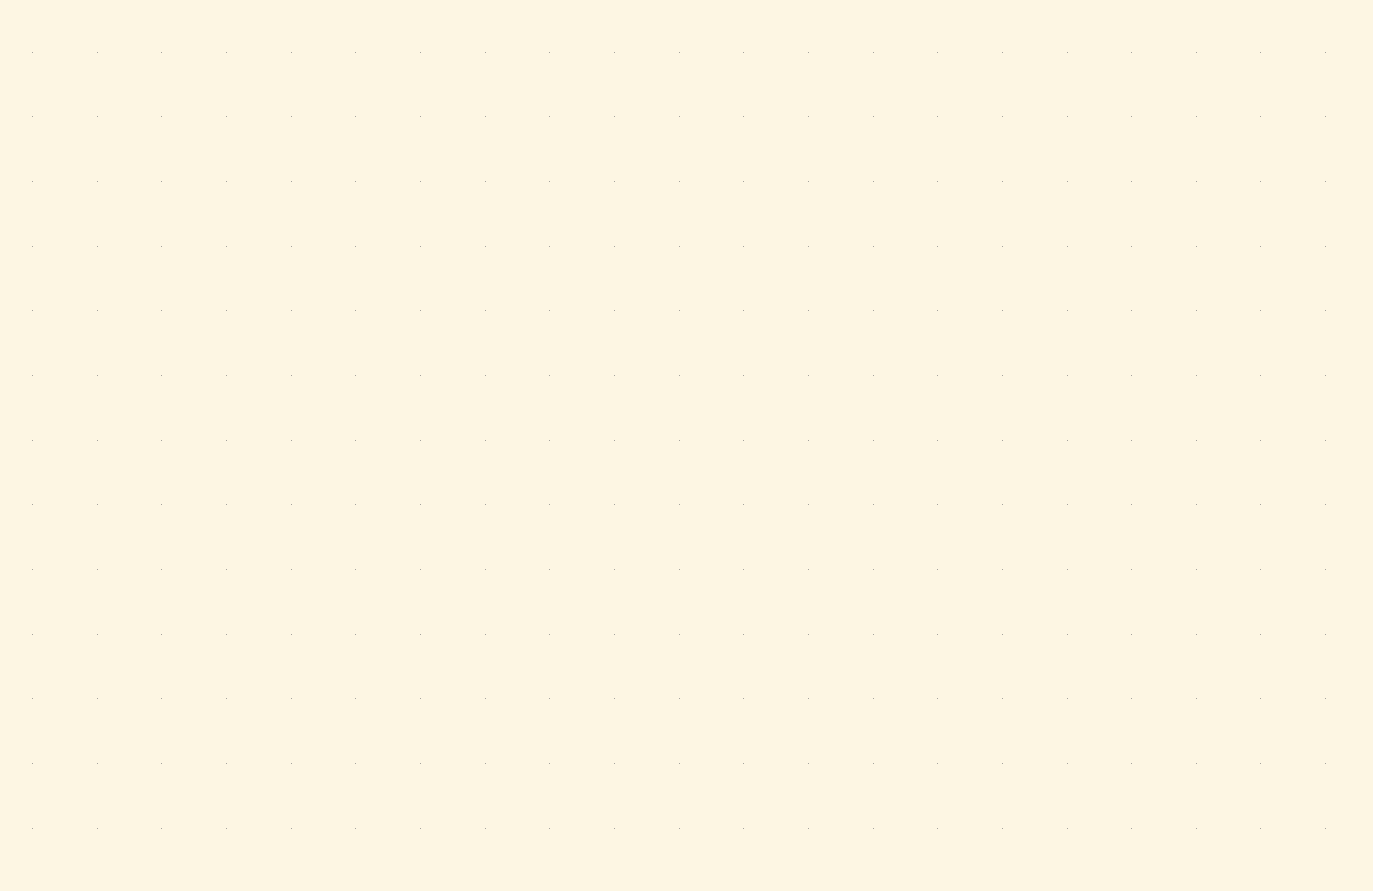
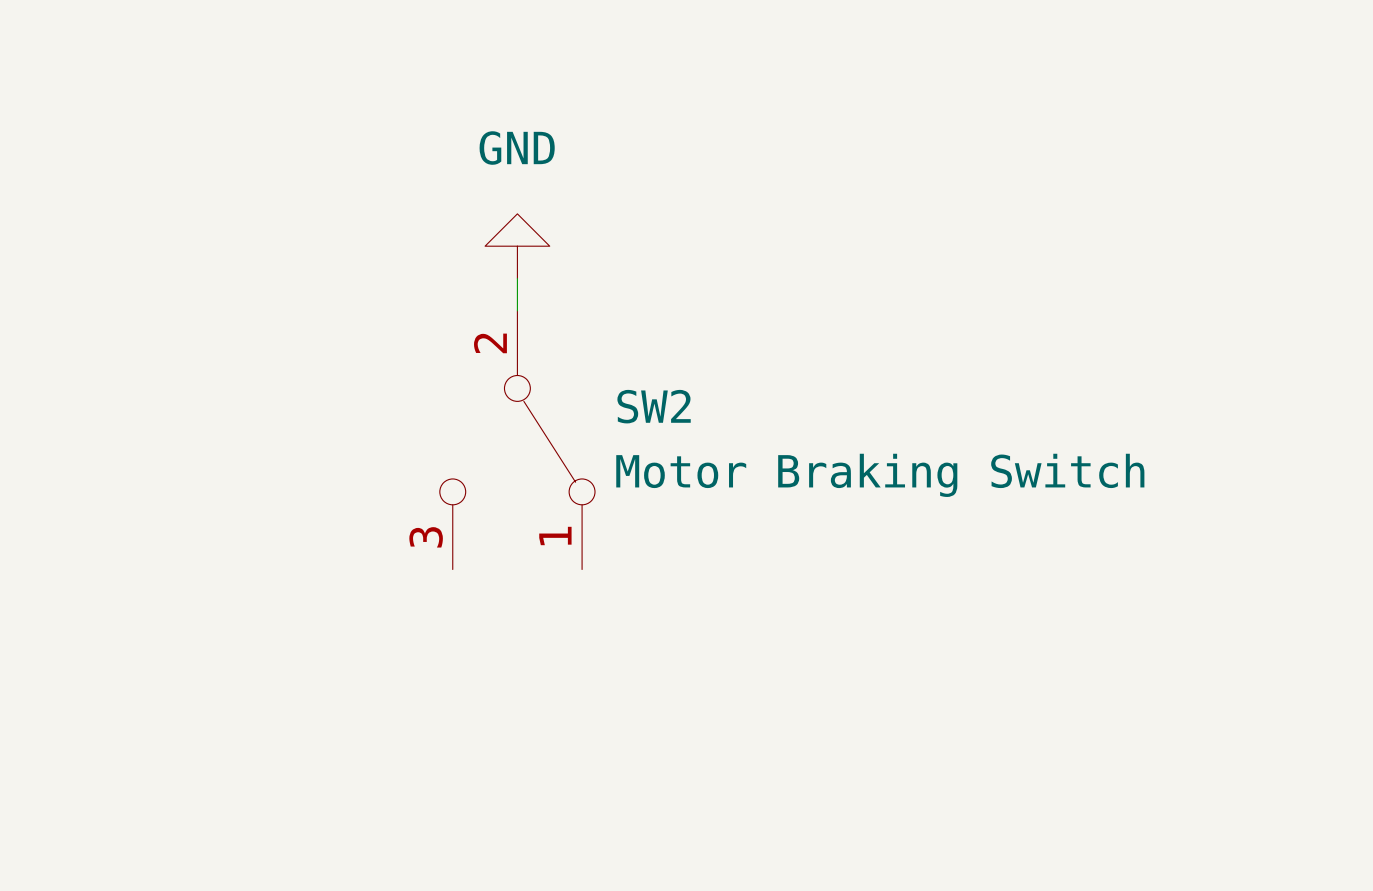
power symbol: none -> GND (517, 246)
wire: none -> (517, 278) (517, 310)
SW2: none -> Motor Braking Switch (517, 440)

